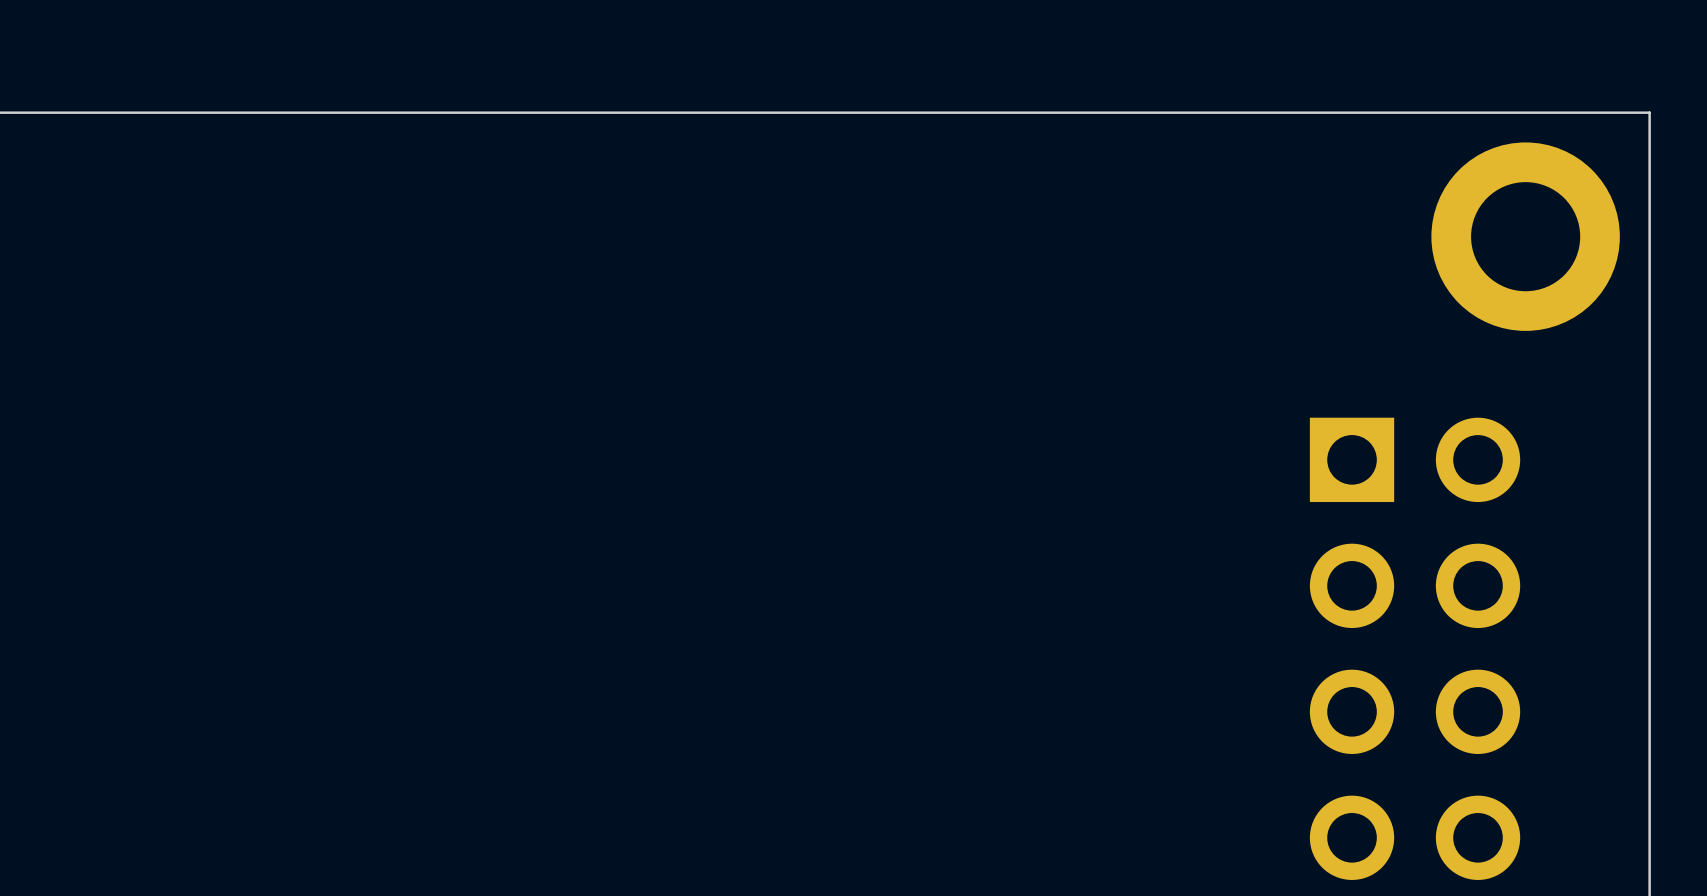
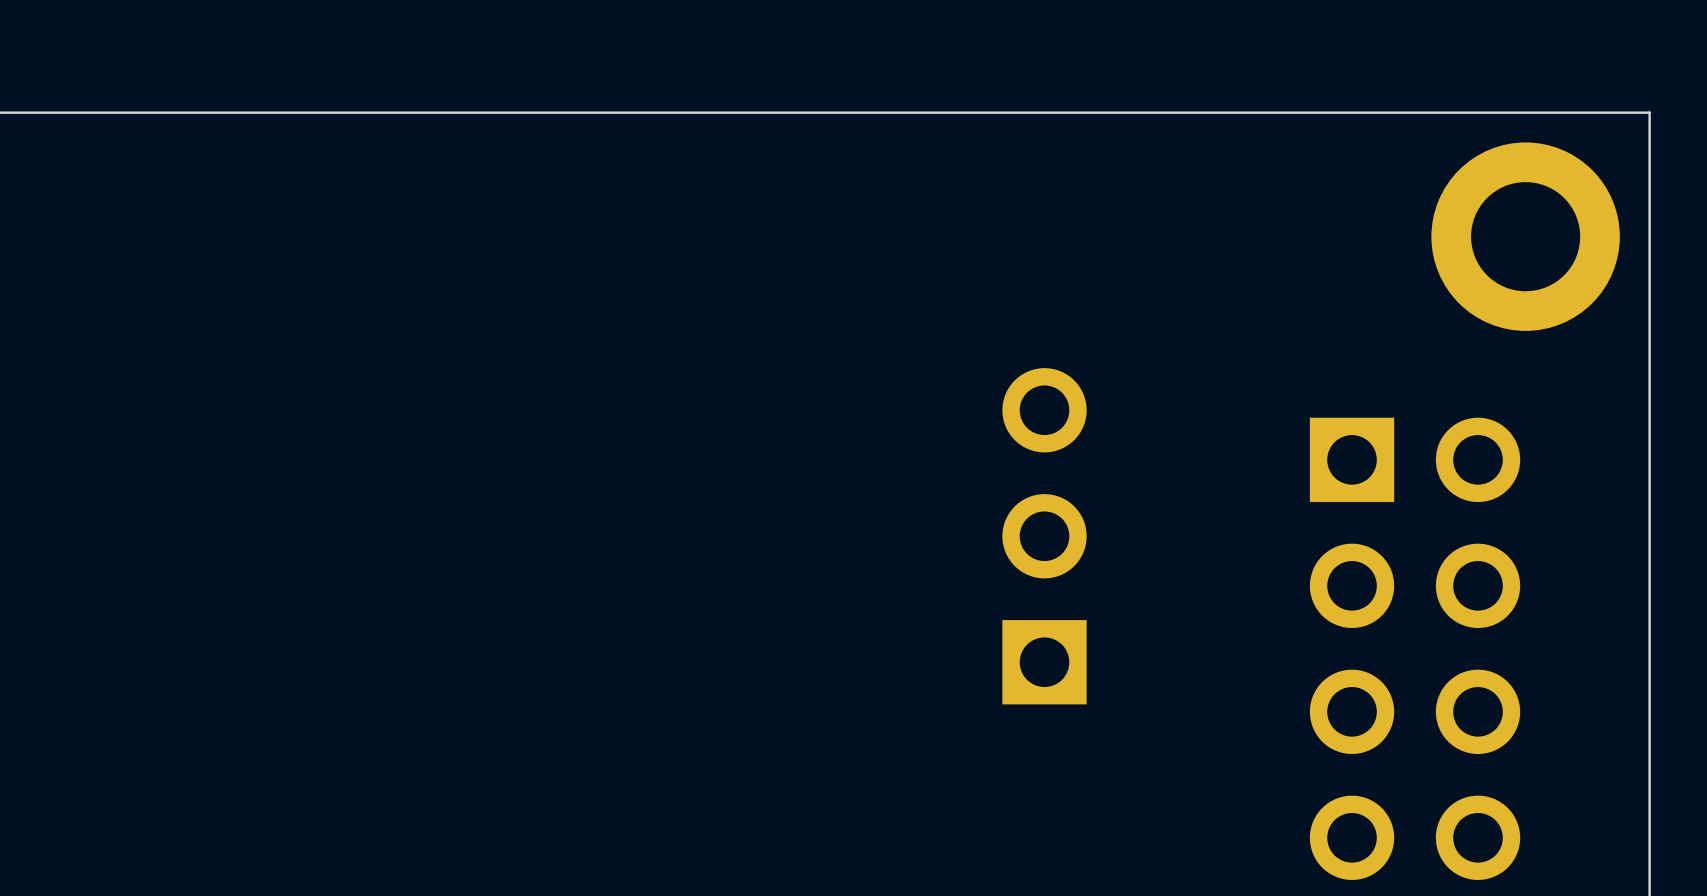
part: none -> (1044, 536)

